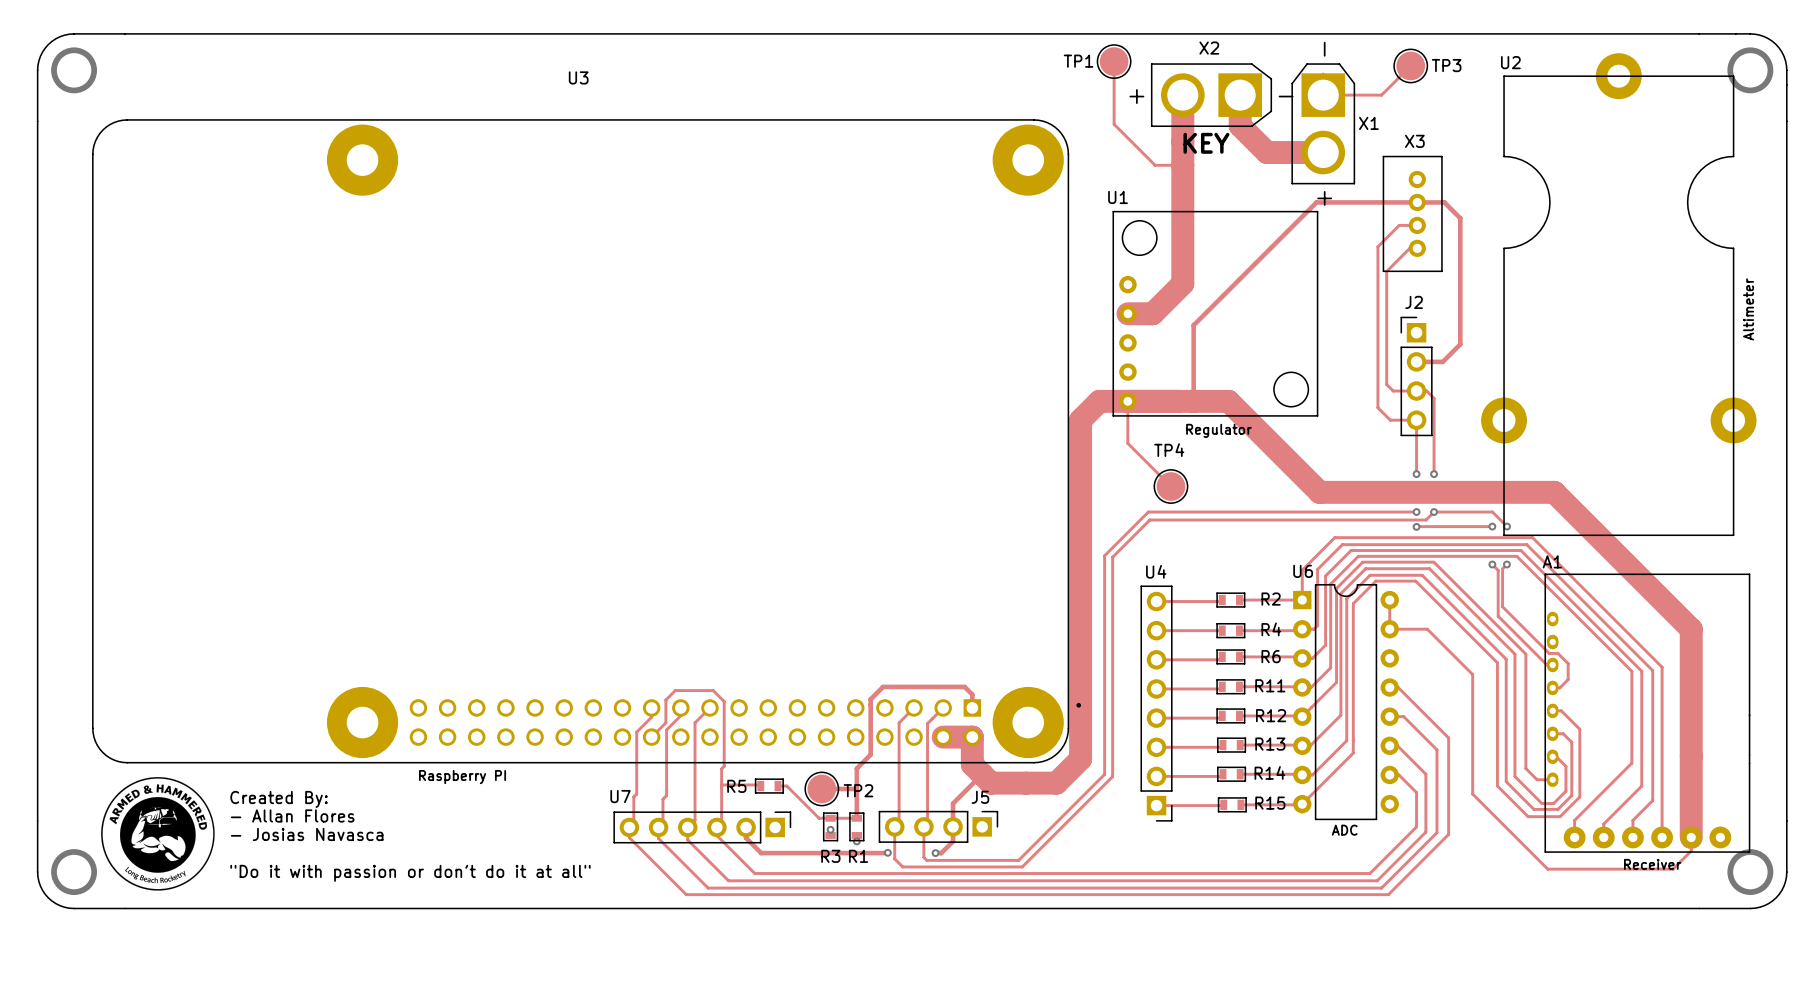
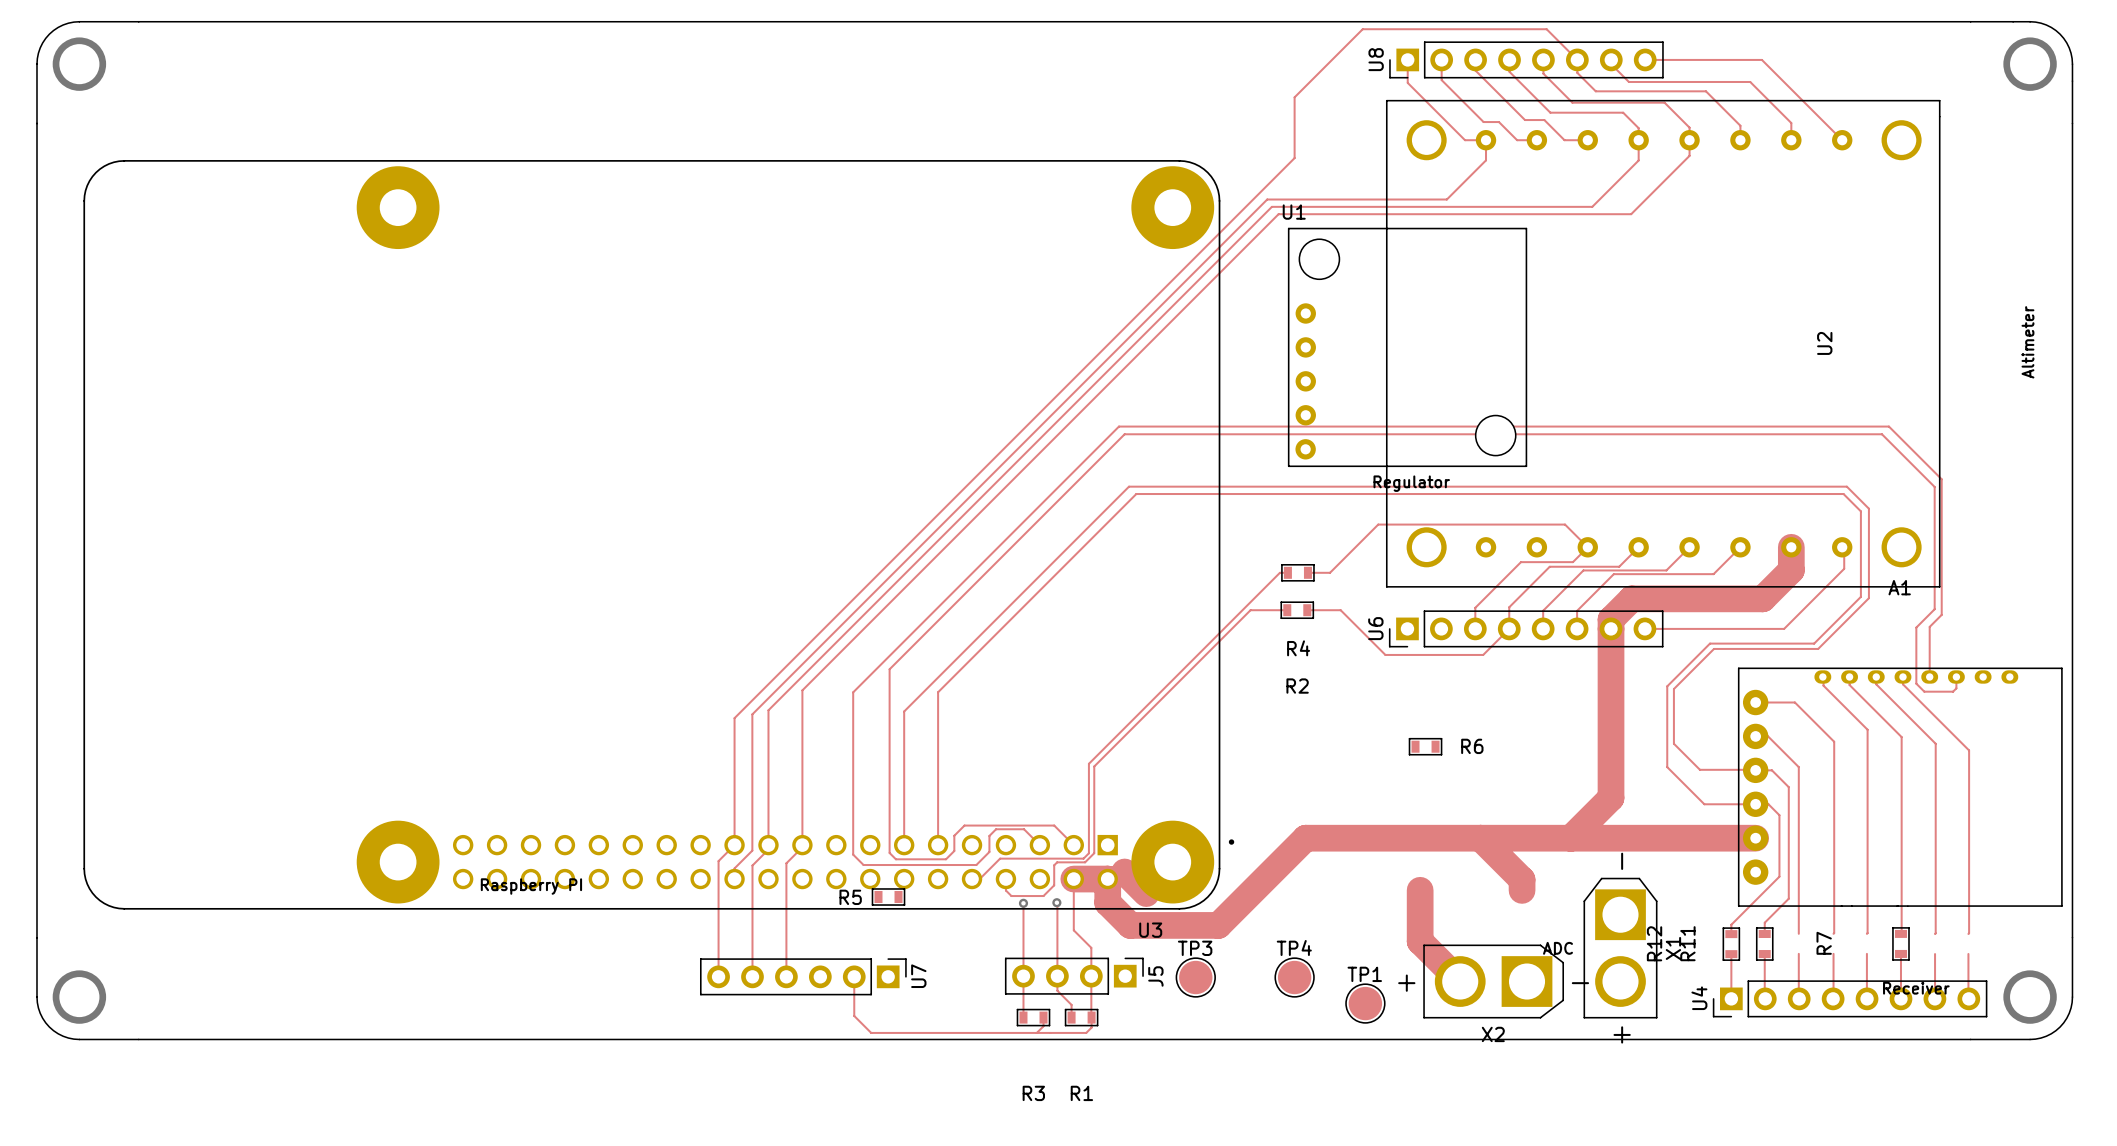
X2 name position: X2 (1209, 48) -> X2 (1493, 1034)
U2 footprint: [1481, 53, 1757, 536] -> [1385, 99, 1941, 588]
TP1 name position: TP1 (1078, 61) -> TP1 (1364, 974)
track: (1114, 61) (1114, 124) (1155, 165) (1182, 165) -> none
TP1 position: (1114, 61) -> (1365, 1003)
U2 name position: U2 (1510, 62) -> U2 (1824, 343)
track: (1410, 65) (1381, 95) (1323, 95) (1323, 74) -> none
TP3 position: (1410, 65) -> (1195, 977)
TP3 name position: TP3 (1446, 65) -> TP3 (1195, 948)
track: none -> (1407, 59) (1407, 82) (1465, 140) (1486, 140) (1486, 160) (1446, 199) (1267, 199) (752, 714) (752, 850) (734, 868) (734, 879)
track: none -> (1441, 59) (1441, 80) (1483, 122) (1498, 122) (1517, 140) (1536, 140)
track: none -> (1475, 59) (1475, 70) (1525, 120) (1544, 120) (1564, 140) (1587, 140)
track: none -> (1509, 59) (1509, 71) (1550, 112) (1623, 112) (1638, 128) (1638, 160) (1592, 206) (1271, 206) (768, 710) (768, 849) (752, 865) (752, 976)
U8: none -> (1526, 59)
track: none -> (1543, 59) (1543, 73) (1572, 102) (1664, 102) (1689, 127) (1689, 155) (1631, 214) (1278, 214) (802, 690) (802, 847) (786, 863) (786, 976)
track: none -> (1611, 59) (1611, 64) (1628, 81) (1750, 81) (1791, 123) (1791, 140)
track: none -> (1645, 59) (1761, 59) (1842, 140)
U3 name position: U3 (578, 77) -> U3 (1150, 930)
track: (1240, 80) (1240, 125) (1266, 152) (1323, 152) -> none
track: (1182, 95) (1182, 283) (1152, 313) (1127, 313) -> none
X2 position: (1211, 95) -> (1493, 981)
X1 position: (1323, 123) -> (1620, 948)
X1 name rotation: 0° (1368, 123) -> 90° counterclockwise (1673, 948)
track: none -> (1740, 140) (1740, 125) (1705, 91) (1595, 91) (1577, 72) (1577, 59) (1546, 29) (1362, 29) (1294, 97) (1294, 158) (734, 718) (734, 845) (718, 861) (718, 976)
text: KEY (1206, 143) -> none
X3: (1412, 213) -> none
track: (1417, 225) (1399, 225) (1377, 246) (1377, 407) (1390, 420) (1416, 420) (1416, 474) -> none
track: (1417, 248) (1409, 248) (1386, 271) (1386, 384) (1393, 391) (1426, 391) (1434, 398) (1434, 474) -> none
track: (1416, 361) (1442, 361) (1460, 344) (1460, 218) (1444, 202) (1316, 202) (1193, 325) (1193, 401) -> none
J2: (1416, 376) -> none
track: (1127, 401) (1127, 443) (1170, 486) -> none
U3 position: (586, 441) -> (658, 534)
TP4 name position: TP4 (1169, 450) -> TP4 (1294, 948)
via: (1416, 474) -> none
via: (1434, 474) -> none
track: none -> (1638, 547) (1619, 566) (1549, 566) (1509, 607) (1509, 628) (1483, 654) (1385, 654) (1340, 610) (1307, 610)
track: none -> (1689, 547) (1666, 570) (1583, 570) (1543, 610) (1543, 628)
track: none -> (1740, 547) (1713, 574) (1613, 574) (1577, 610) (1577, 628)
track: none -> (1791, 547) (1791, 570) (1762, 598) (1631, 598) (1611, 619) (1611, 798) (1570, 838)
track: none -> (1844, 547) (1844, 568) (1784, 628) (1644, 628)
TP4 position: (1170, 486) -> (1294, 977)
track: none -> (1287, 572) (1279, 572) (1088, 763) (1088, 853) (1083, 858) (1000, 858) (979, 879) (972, 879)
track: none -> (1307, 572) (1330, 572) (1378, 524) (1565, 524) (1587, 547) (1572, 562) (1521, 562) (1475, 607) (1475, 628)
track: (1416, 512) (1148, 512) (1104, 555) (1104, 774) (1018, 860) (926, 860) (923, 857) (923, 826) (927, 823) (927, 723) (943, 707) -> none
via: (1416, 512) -> none
via: (1434, 512) -> none
via: (1416, 526) -> none
via: (1492, 526) -> none
track: (1507, 526) (1492, 512) (1434, 512) (1426, 520) (1149, 520) (1112, 557) (1112, 776) (1022, 866) (902, 866) (894, 858) (894, 826) (899, 822) (899, 722) (914, 707) -> none
via: (1507, 526) -> none
track: none -> (1287, 610) (1250, 610) (1094, 766) (1094, 853) (1085, 862) (1057, 862) (1054, 865) (1054, 885) (1043, 896) (1011, 896) (1005, 890) (1005, 879)
A1 name position: A1 (1552, 561) -> A1 (1899, 587)
track: (1492, 564) (1498, 570) (1498, 616) (1546, 664) (1552, 664) -> none
via: (1492, 564) -> none
track: (1506, 564) (1502, 568) (1502, 606) (1549, 653) (1557, 653) (1568, 663) (1568, 679) (1559, 687) (1552, 687) -> none
via: (1506, 564) -> none
U4 name position: U4 (1156, 571) -> U4 (1699, 998)
U6 name position: U6 (1303, 571) -> U6 (1375, 628)
U6 footprint: [1293, 584, 1399, 821] -> [1388, 610, 1664, 648]
track: none -> (1823, 677) (1823, 685) (1867, 729) (1866, 933)
track: none -> (1849, 676) (1849, 685) (1901, 737) (1900, 933)
track: none -> (1876, 676) (1876, 684) (1935, 743) (1935, 934)
track: none -> (1902, 676) (1902, 684) (1969, 750) (1968, 933)
track: none -> (1929, 676) (1929, 626) (1941, 614) (1941, 479) (1888, 426) (1118, 426) (853, 692) (853, 854) (863, 865) (976, 865) (989, 851) (989, 835) (996, 829) (1024, 829) (1039, 845) (1039, 838)
track: none -> (1956, 676) (1956, 688) (1953, 691) (1924, 691) (1916, 683) (1916, 627) (1934, 609) (1934, 486) (1881, 434) (1124, 434) (889, 669) (889, 852) (895, 859) (946, 859) (954, 850) (954, 835) (964, 825) (1054, 825) (1073, 845)
R2 name position: R2 (1271, 599) -> R2 (1297, 686)
track: (1222, 600) (1156, 601) -> none
R2 position: (1230, 600) -> (1297, 610)
track: (1239, 600) (1302, 600) (1302, 570) (1334, 537) (1532, 537) (1662, 667) (1662, 837) -> none
track: (1389, 600) (1389, 629) (1427, 629) (1472, 674) (1472, 794) (1547, 869) (1673, 869) (1691, 851) (1691, 629) (1554, 492) (1319, 492) (1228, 401) (1099, 401) (1080, 420) (1080, 759) (1056, 783) (988, 783) -> none
track: none -> (1755, 702) (1794, 702) (1834, 741) (1833, 933)
R4 name position: R4 (1271, 629) -> R4 (1298, 648)
track: (1156, 630) (1222, 630) -> none
R4 position: (1230, 630) -> (1297, 572)
track: (1239, 630) (1313, 629) (1317, 625) (1317, 569) (1342, 544) (1526, 544) (1652, 670) (1652, 800) (1632, 820) (1632, 837) -> none
track: none -> (1755, 736) (1768, 736) (1798, 767) (1798, 933)
track: (1222, 656) (1219, 659) (1156, 659) -> none
track: (1239, 656) (1312, 658) (1325, 645) (1325, 576) (1351, 550) (1520, 550) (1641, 671) (1641, 786) (1603, 824) (1603, 837) -> none
R11 name position: R11 (1270, 685) -> R11 (1687, 943)
track: (1222, 686) (1220, 688) (1156, 688) -> none
R11 rotation: 0° (1230, 686) -> 90° clockwise (1764, 944)
R11 position: (1230, 686) -> (1764, 944)
track: (1239, 686) (1311, 687) (1330, 667) (1330, 584) (1358, 556) (1516, 556) (1631, 671) (1631, 763) (1574, 820) (1574, 837) -> none
track: (1389, 687) (1398, 687) (1448, 737) (1448, 834) (1388, 894) (686, 894) (629, 837) (629, 827) (633, 823) (633, 796) (636, 794) (636, 732) (651, 717) (651, 707) -> none
U4 rotation: 0° (1156, 703) -> 90° clockwise (1850, 998)
U4 position: (1156, 703) -> (1850, 998)
track: (680, 707) (680, 715) (666, 729) (666, 795) (662, 799) (662, 823) (658, 827) (658, 838) (708, 888) (1381, 888) (1436, 832) (1436, 749) (1403, 716) (1389, 716) -> none
track: (972, 707) (972, 694) (964, 686) (883, 686) (870, 699) (870, 754) (856, 768) (856, 818) (819, 818) (786, 786) (777, 786) -> none
track: (709, 709) (695, 722) (695, 820) (687, 827) (687, 839) (728, 880) (1377, 880) (1425, 832) (1425, 774) (1397, 745) (1389, 745) -> none
track: (1552, 710) (1561, 710) (1579, 729) (1579, 796) (1560, 816) (1528, 816) (1497, 786) (1497, 662) (1415, 581) (1375, 581) (1353, 603) (1353, 753) (1301, 804) (1240, 804) -> none
A1 rotation: 0° (1647, 713) -> 90° clockwise (1900, 787)
track: (1222, 715) (1220, 718) (1156, 718) -> none
R12 rotation: 0° (1230, 715) -> 90° clockwise (1731, 944)
R12 position: (1230, 715) -> (1731, 944)
track: (1239, 715) (1302, 716) -> none
R12 name position: R12 (1271, 715) -> R12 (1654, 943)
track: (1302, 716) (1336, 682) (1336, 588) (1362, 562) (1433, 562) (1525, 654) (1525, 768) (1537, 779) (1552, 779) -> none
track: (1552, 733) (1563, 733) (1571, 742) (1571, 795) (1557, 809) (1533, 809) (1506, 781) (1506, 659) (1422, 575) (1370, 575) (1346, 598) (1346, 740) (1312, 774) (1240, 774) -> none
track: none -> (1480, 838) (1522, 879) (1522, 890)
track: none -> (1755, 838) (1305, 838) (1218, 925) (1130, 925) (1107, 902) (1107, 879) (1073, 879) (1073, 930) (1091, 947) (1091, 1027) (1086, 1032) (871, 1032) (854, 1015) (854, 976)
track: (651, 737) (665, 722) (665, 700) (675, 690) (713, 690) (724, 701) (721, 822) (716, 827) (716, 835) (754, 873) (1369, 873) (1416, 826) (1416, 792) (1398, 774) (1389, 774) -> none
track: (943, 737) (972, 737) (972, 778) -> none
track: none -> (903, 844) (904, 711) (1128, 486) (1846, 486) (1868, 508) (1868, 598) (1818, 648) (1713, 648) (1673, 689) (1673, 743) (1699, 769) (1771, 770) (1788, 787) (1788, 898) (1764, 922) (1764, 933)
track: none -> (938, 845) (938, 692) (1136, 494) (1843, 494) (1860, 511) (1860, 596) (1814, 643) (1709, 643) (1667, 686) (1667, 767) (1704, 804) (1768, 804) (1779, 815) (1779, 876) (1731, 924) (1731, 934)
track: (1222, 745) (1220, 747) (1156, 747) -> none
R13: (1231, 745) -> none
track: (1240, 745) (1310, 745) (1340, 715) (1340, 593) (1365, 568) (1429, 568) (1514, 654) (1514, 776) (1541, 803) (1553, 803) (1565, 791) (1565, 766) (1556, 756) (1552, 756) -> none
track: (982, 774) (953, 803) (953, 841) (941, 853) (935, 853) -> none
track: (1222, 774) (1220, 776) (1156, 776) -> none
R14: (1231, 774) -> none
drawing: [101, 777, 215, 891] -> none
track: none -> (1420, 890) (1420, 941) (1460, 981)
track: (721, 784) (760, 786) -> none
track: (821, 788) (856, 789) -> none
TP2: (821, 788) -> none
track: none -> (1056, 902) (1057, 990) (1071, 1004) (1071, 1017)
via: none -> (1056, 902)
track: none -> (1023, 903) (1023, 1017)
via: none -> (1023, 903)
U7 name rotation: 0° (620, 796) -> 90° counterclockwise (918, 976)
U7 name position: U7 (620, 796) -> U7 (918, 976)
J5 name rotation: 0° (980, 797) -> 90° counterclockwise (1155, 976)
J5 name position: J5 (980, 797) -> J5 (1155, 976)
text: Created By: (279, 799) -> none
track: (1223, 804) (1156, 805) -> none
R15: (1232, 804) -> none
text: - Allan Flores (292, 815) -> none
R3 rotation: 0° (830, 826) -> 90° clockwise (1033, 1017)
R3 position: (830, 826) -> (1033, 1017)
R1 rotation: 0° (856, 826) -> 90° clockwise (1081, 1017)
R1 position: (856, 826) -> (1081, 1017)
J5 position: (938, 826) -> (1074, 976)
R7: none -> (1900, 943)
U7 position: (702, 827) -> (803, 976)
track: (746, 827) (746, 837) (761, 853) (887, 852) -> none
via: (830, 829) -> none
text: - Josias Navasca (307, 834) -> none
track: none -> (1798, 953) (1799, 998)
track: none -> (1833, 953) (1833, 998)
track: none -> (1866, 953) (1866, 998)
track: none -> (1731, 954) (1731, 998)
track: none -> (1764, 954) (1765, 998)
track: none -> (1900, 953) (1900, 998)
track: none -> (1935, 954) (1935, 998)
track: none -> (1968, 953) (1968, 998)
via: (856, 841) -> none
via: (887, 852) -> none
via: (935, 853) -> none
R3 name position: R3 (830, 856) -> R3 (1033, 1093)
R1 name position: R1 (858, 856) -> R1 (1081, 1093)
text: "Do it with passion or don't do it at all" (410, 873) -> none
track: none -> (1043, 1017) (1043, 1026) (1036, 1032)

